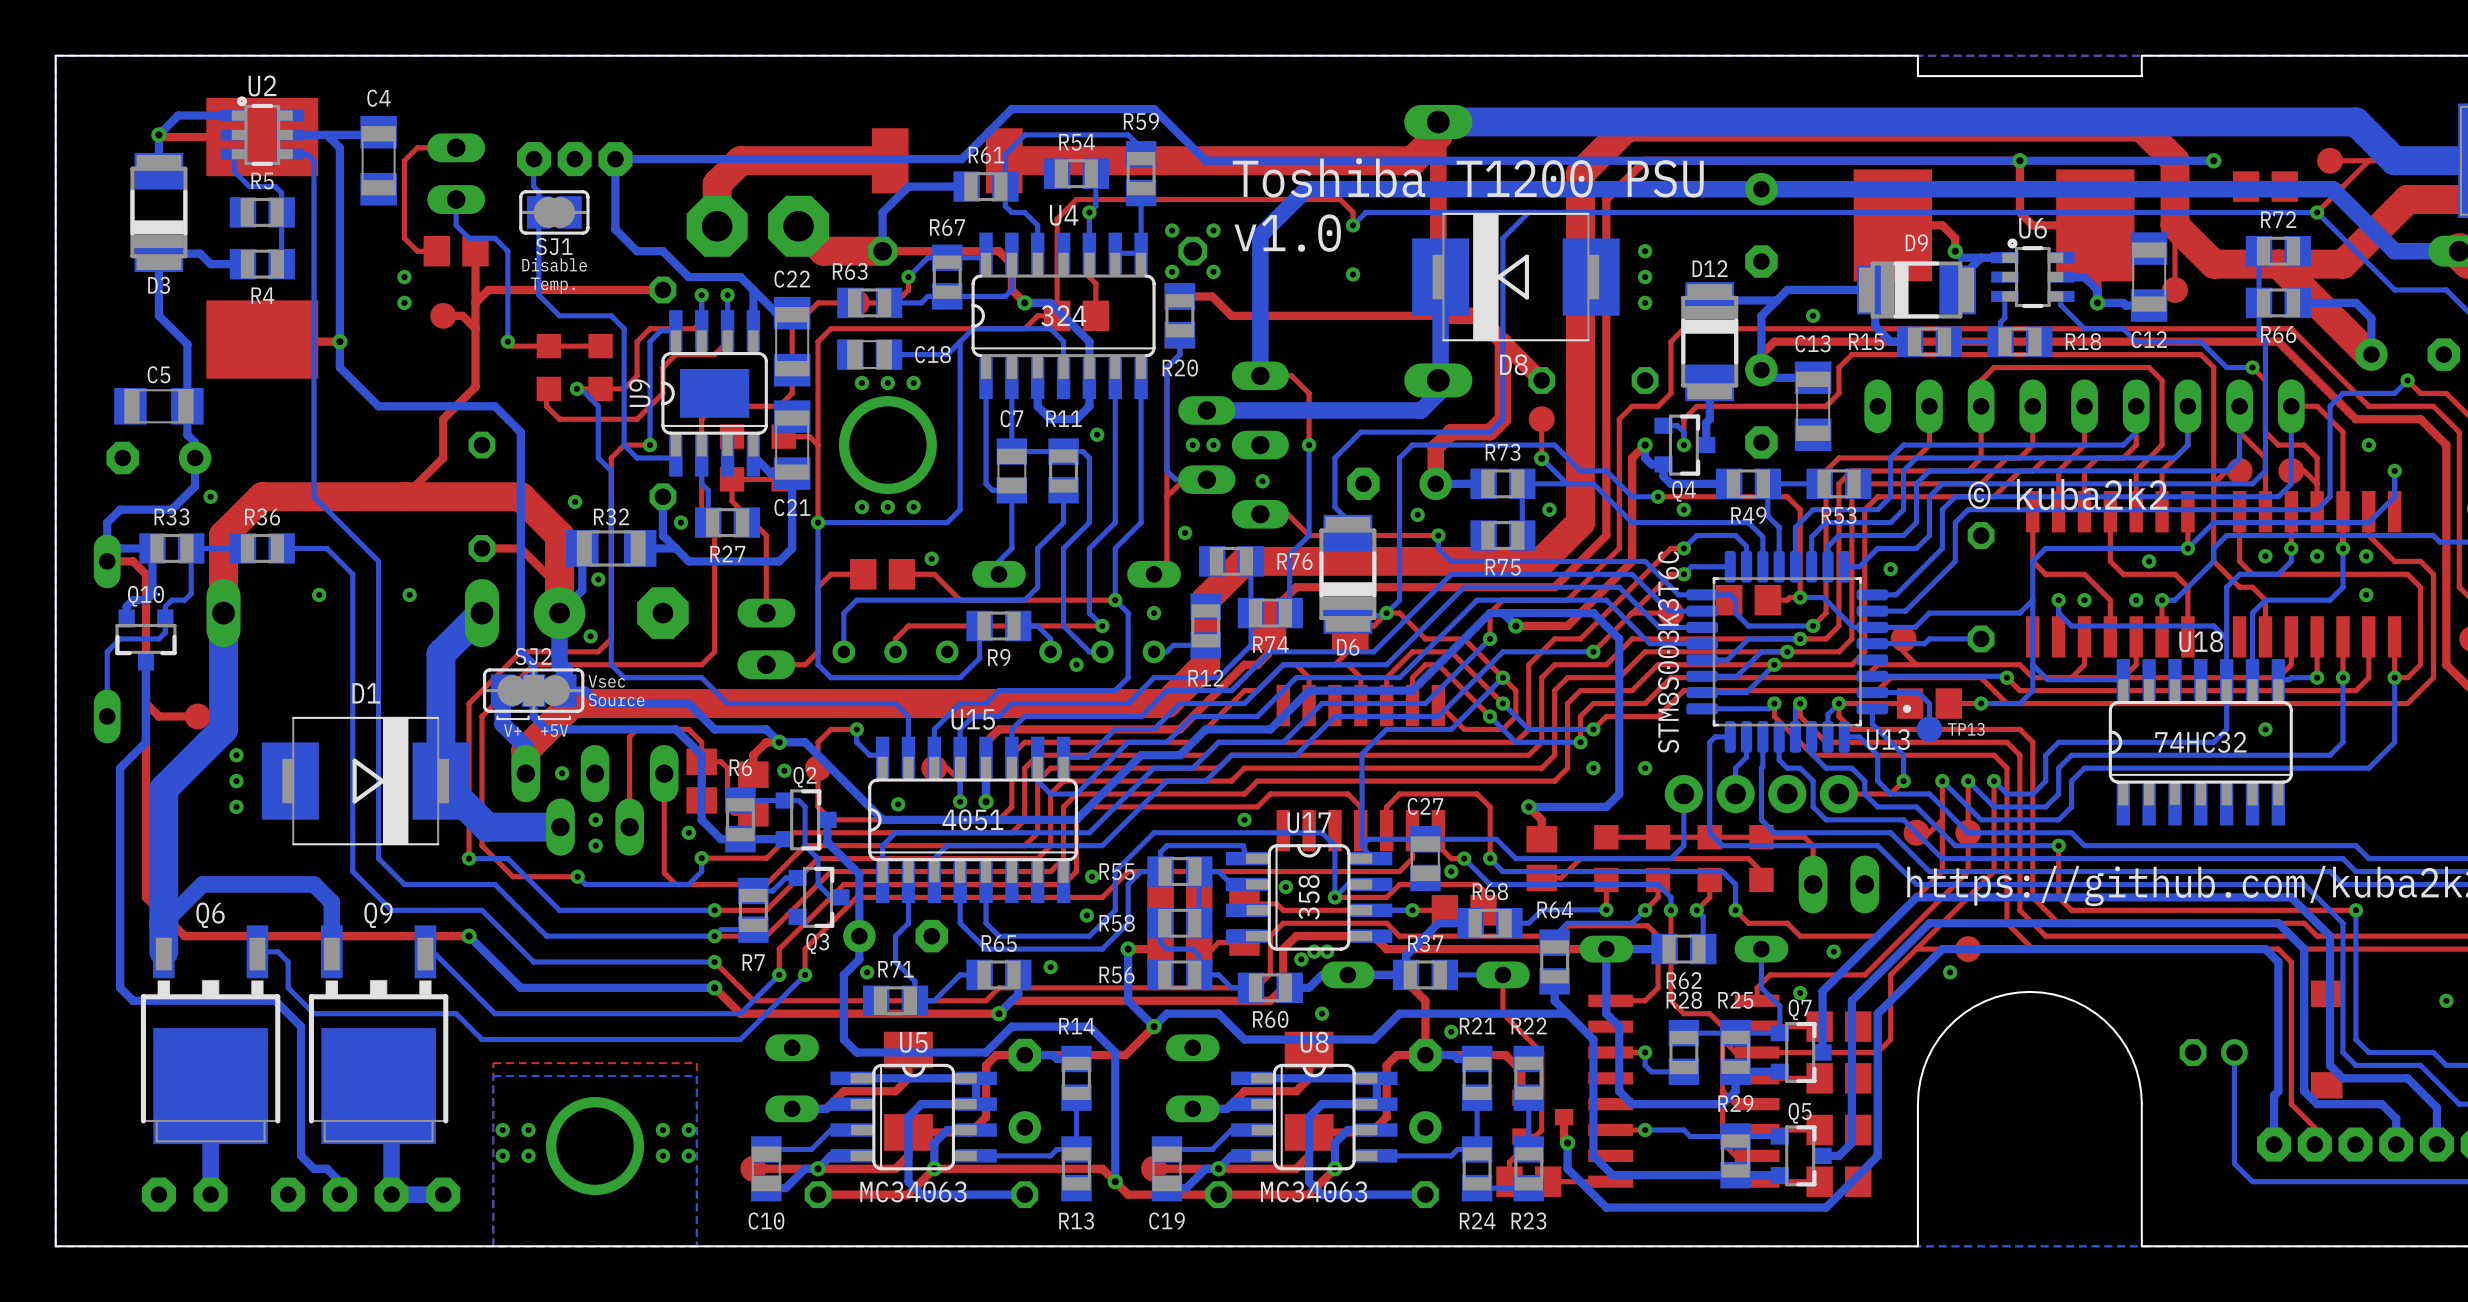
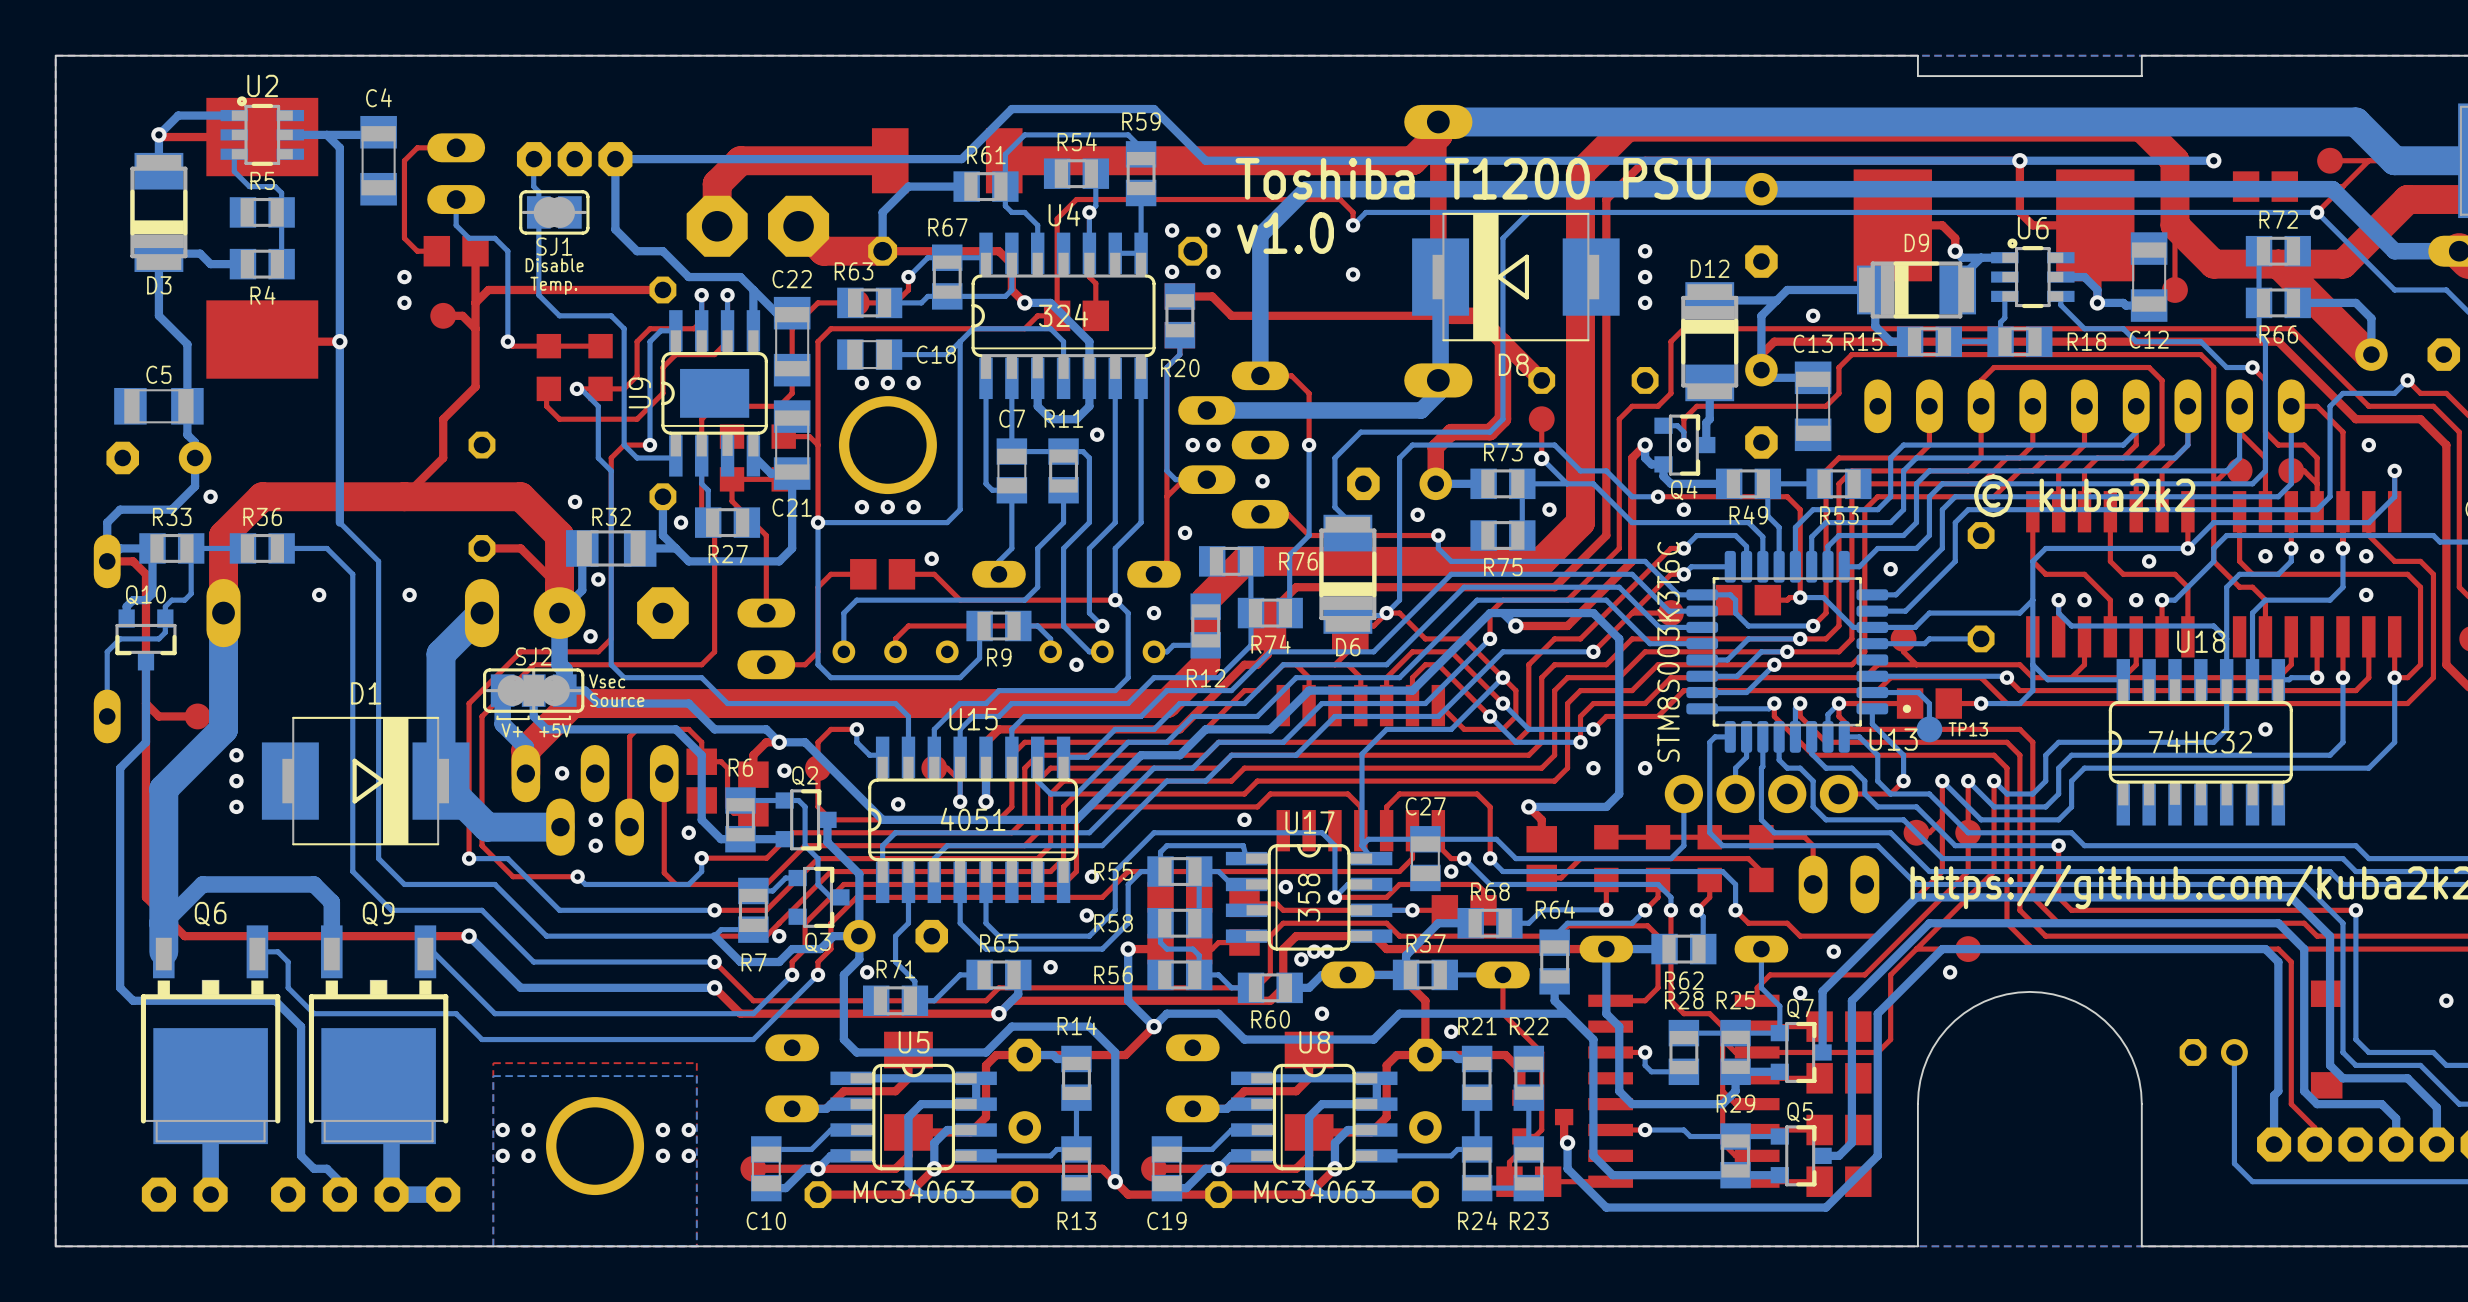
bottom track: (290, 154) (307, 154) (313, 160) (313, 496) (339, 522) -> (339, 367) (339, 522)
bottom track: (339, 367) (378, 406) (494, 406) (520, 432) (520, 651) (533, 664) (533, 690) -> none
top track: (805, 923) (779, 949) (779, 974) -> (805, 923) (805, 949) (792, 962) (792, 974)
top track: (830, 923) (805, 949) (805, 974) -> (830, 923) (830, 949) (818, 962) (818, 974)
via: (714, 936) -> none
via: none -> (779, 936)
bottom track: none -> (859, 936) (833, 936) (820, 949) (792, 949) (779, 962) (740, 962) (714, 936)
bottom track: (779, 974) (740, 1013) -> (792, 974) (753, 1013) (740, 1013)
via: (779, 974) -> none
via: none -> (792, 974)
bottom track: (805, 974) (740, 1039) -> (818, 974) (753, 1039) (740, 1039)
via: (805, 974) -> none
via: none -> (818, 974)

